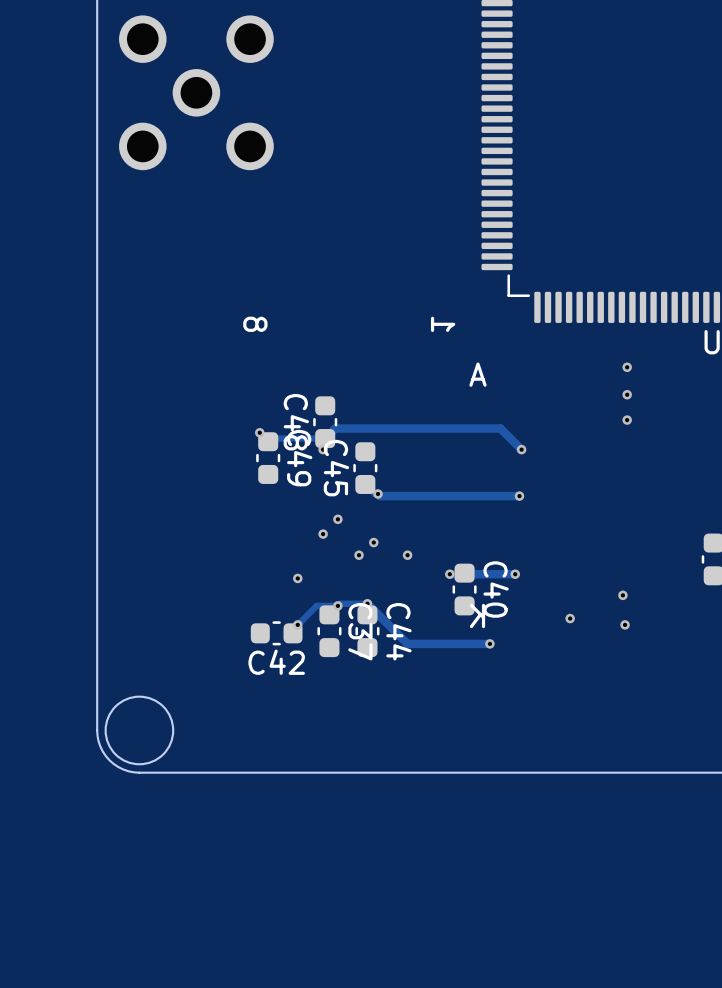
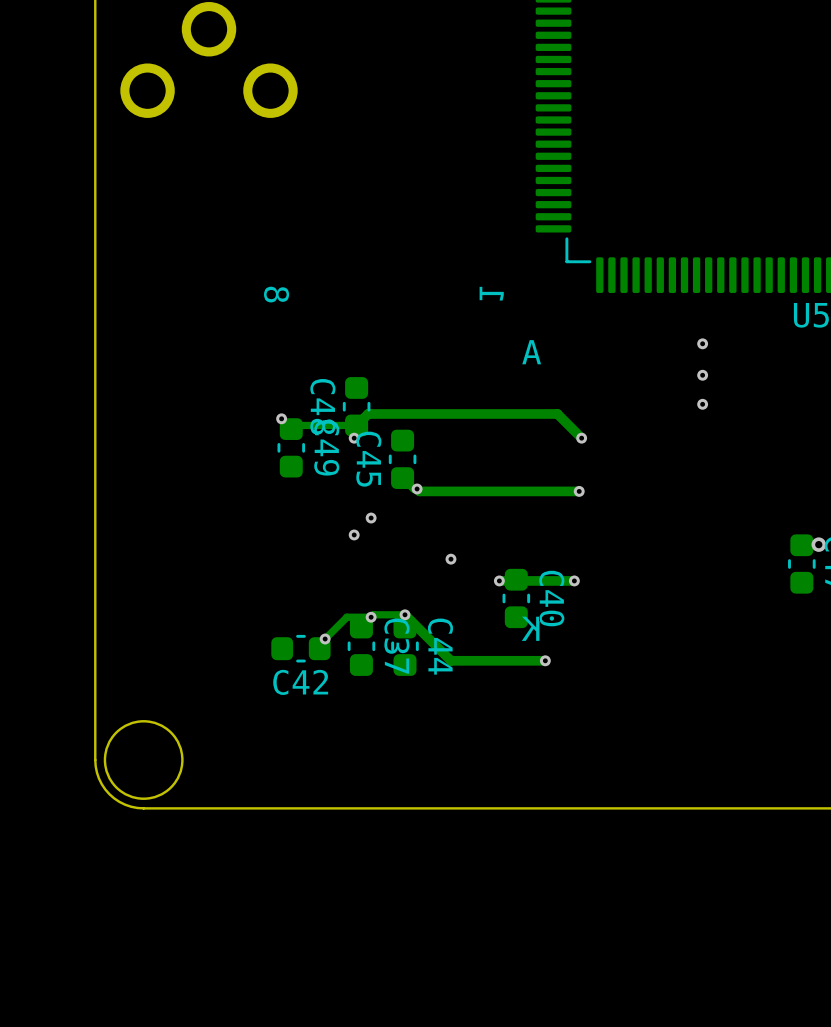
via: (373, 542) -> none
via: (359, 555) -> none
via: (297, 578) -> none
via: (622, 595) -> none
via: (570, 618) -> none
via: (625, 624) -> none

